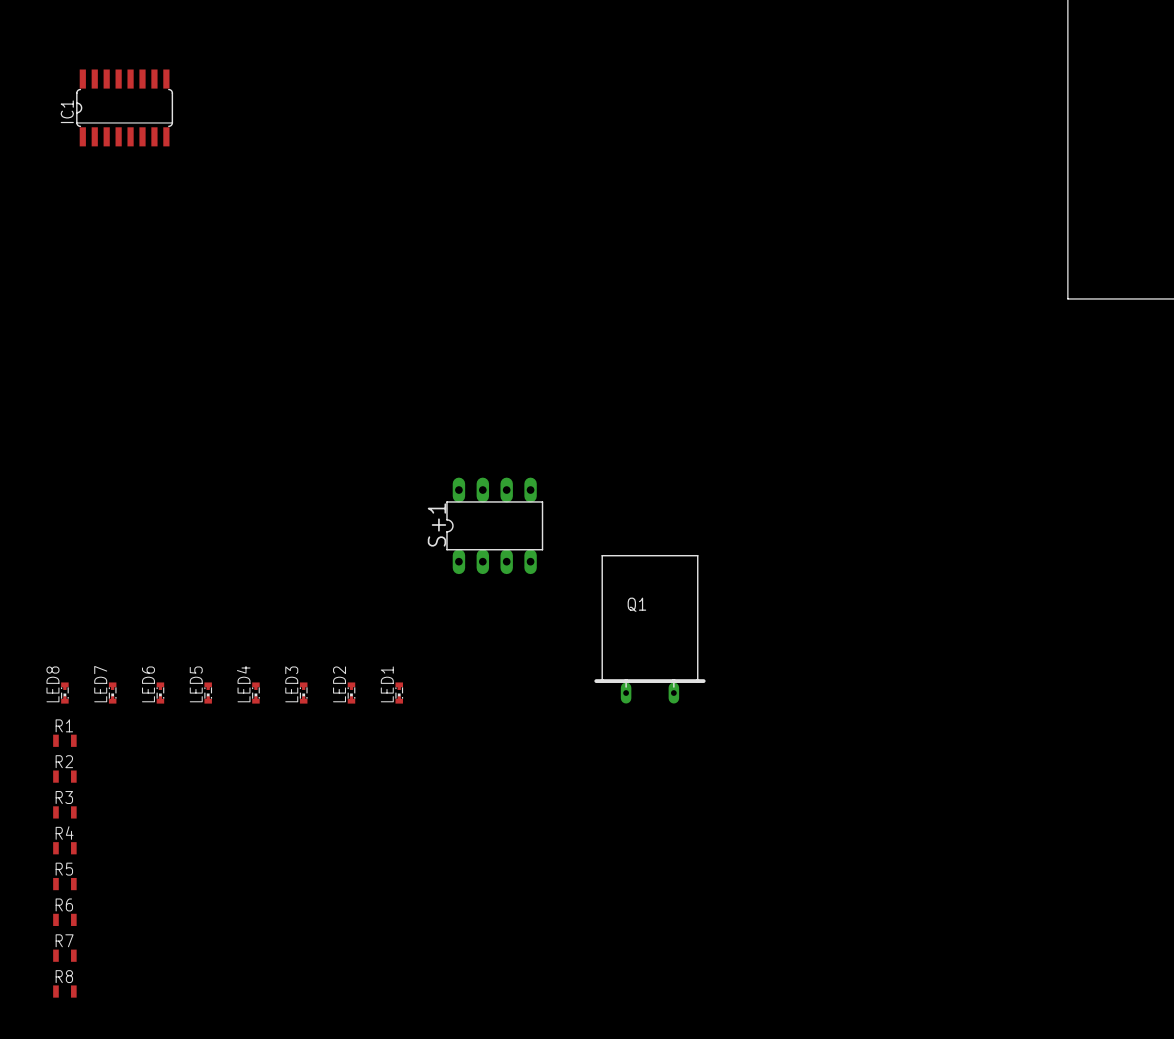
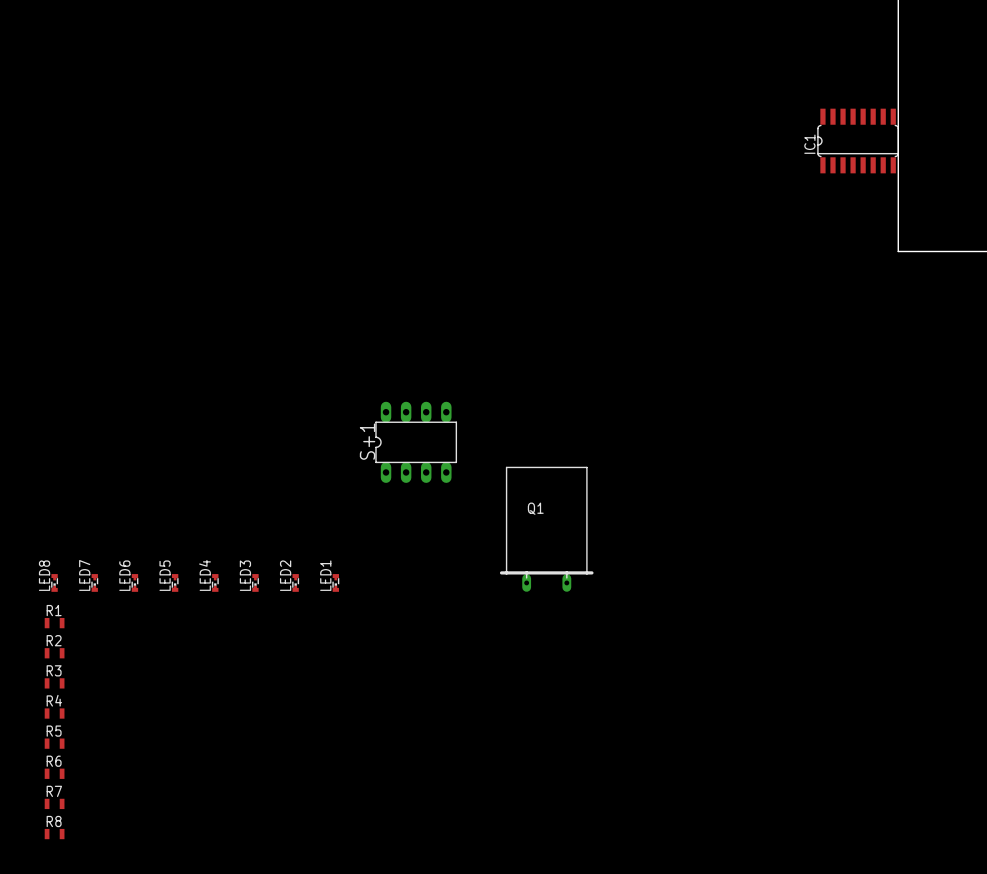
IC1 position: (124, 107) -> (858, 141)

